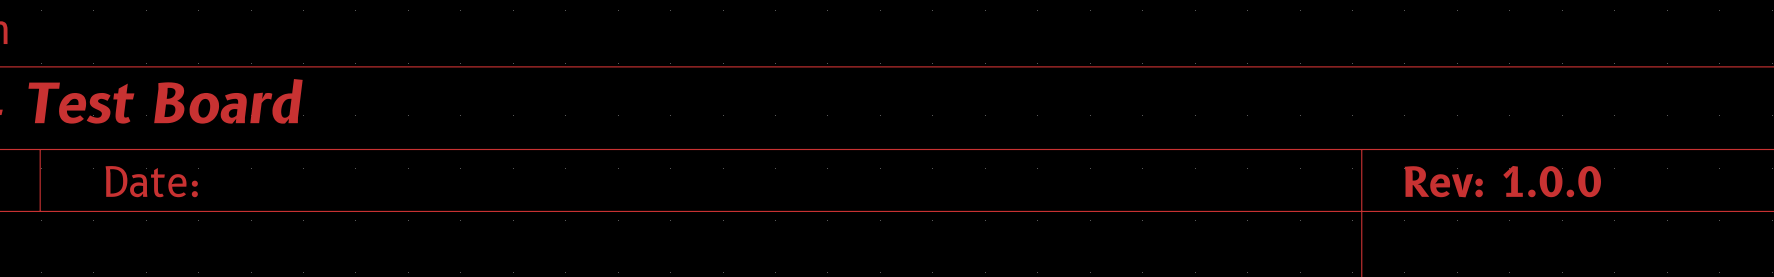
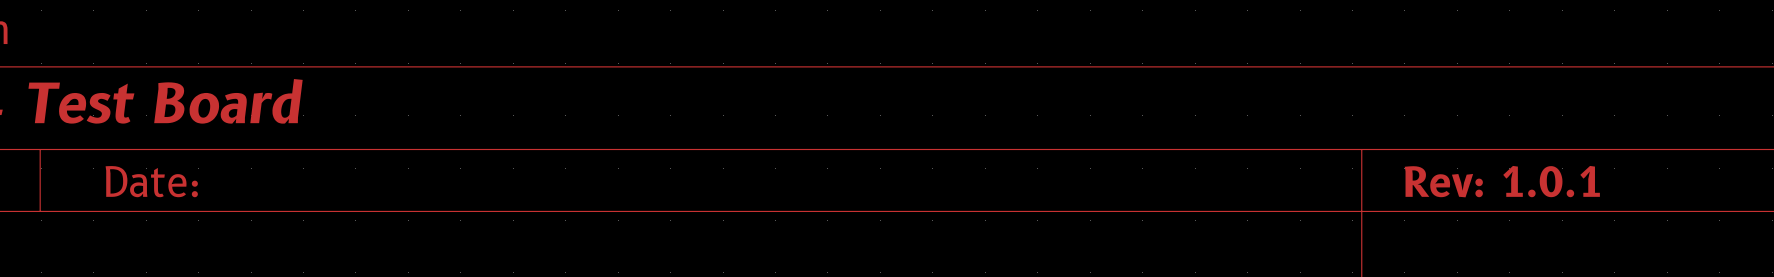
title block: Rev: 1.0.0 (1502, 181) -> Rev: 1.0.1 (1502, 181)

